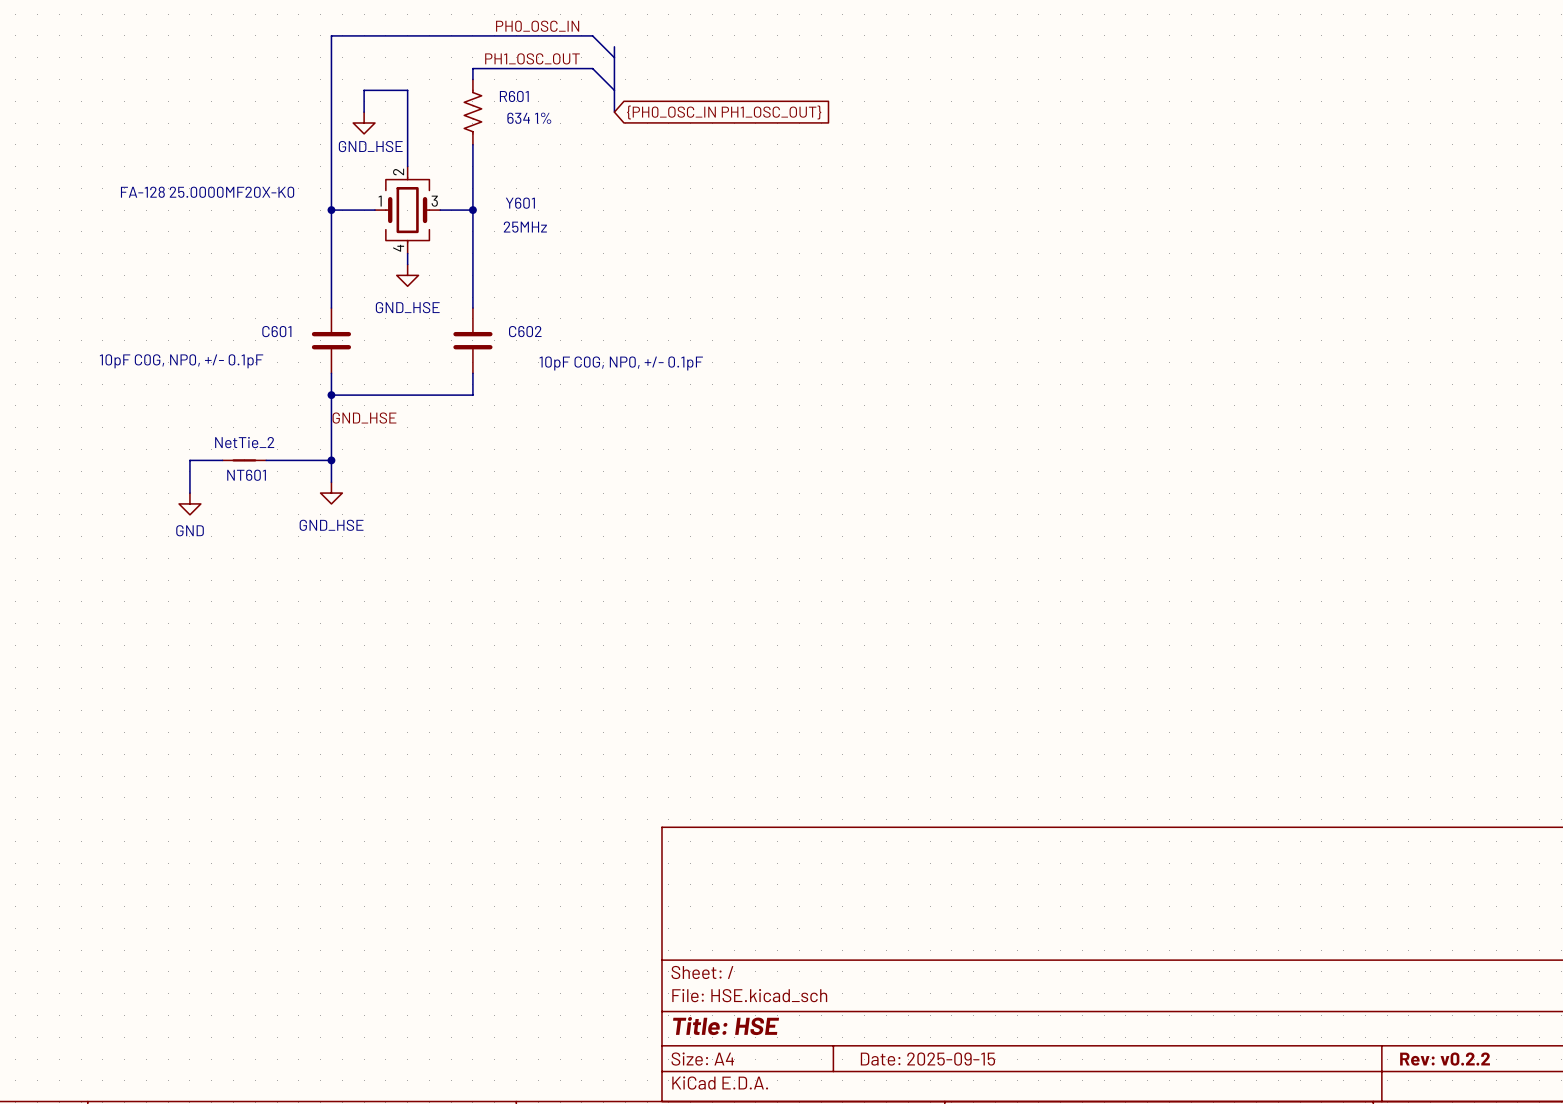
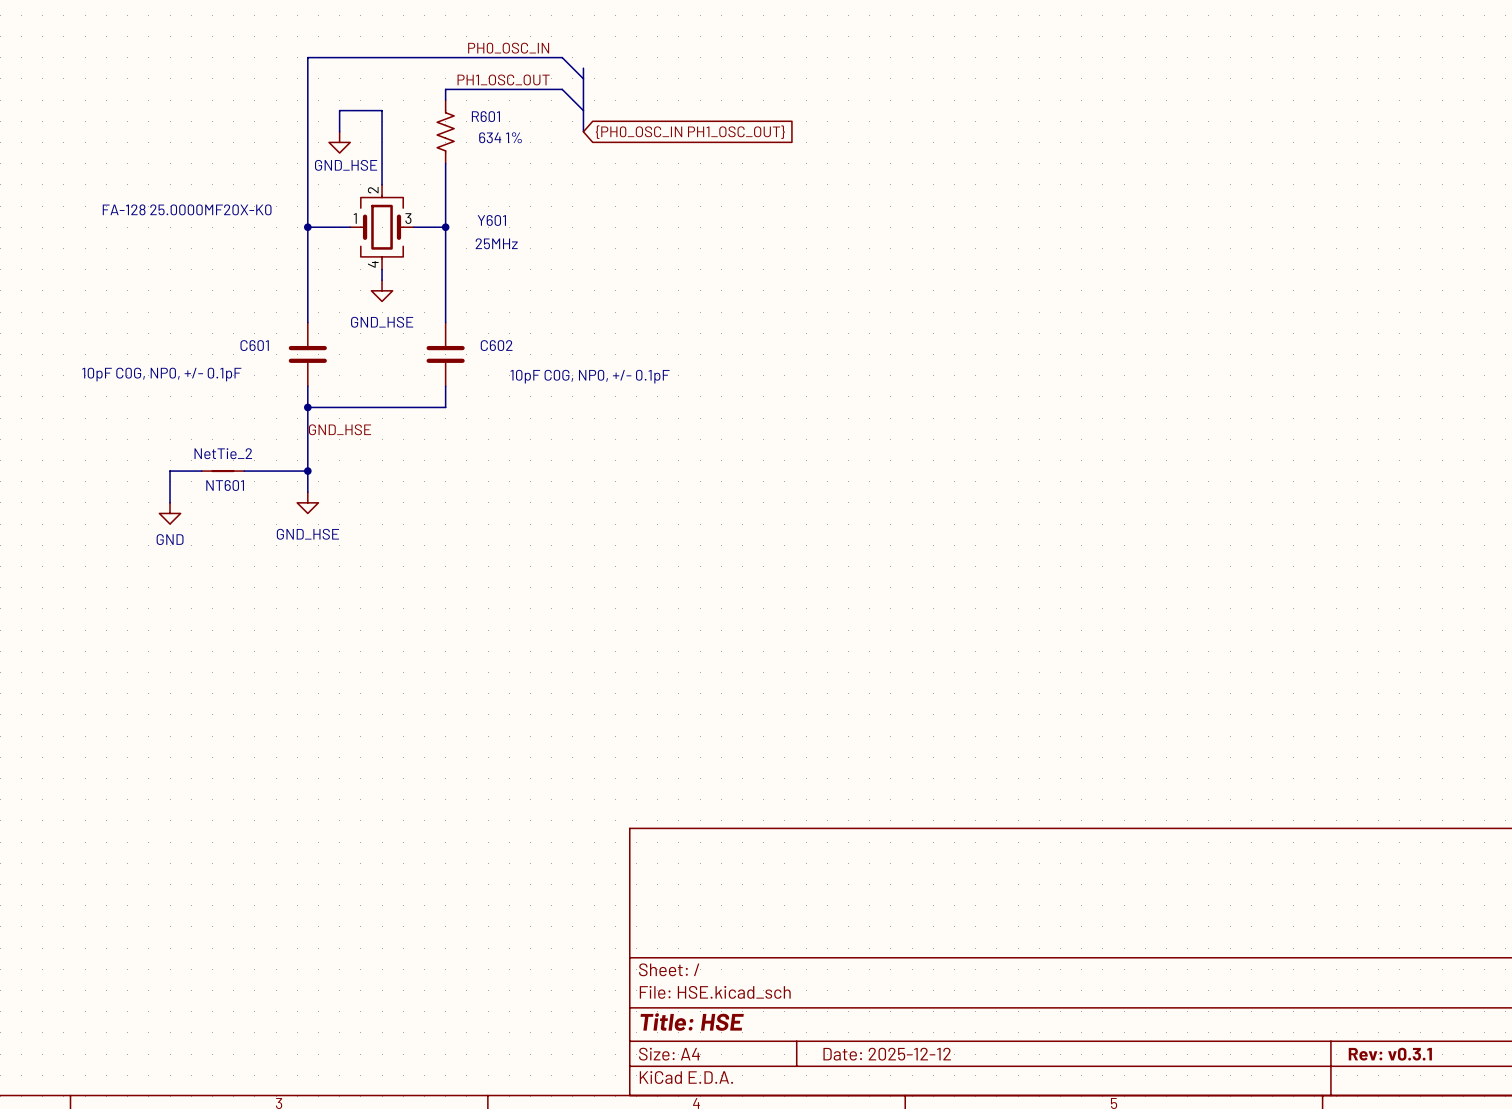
title block: Date: 2025-09-15 (927, 1059) -> Date: 2025-12-12 (887, 1054)
title block: Rev: v0.2.2 (1445, 1059) -> Rev: v0.3.1 (1390, 1054)

